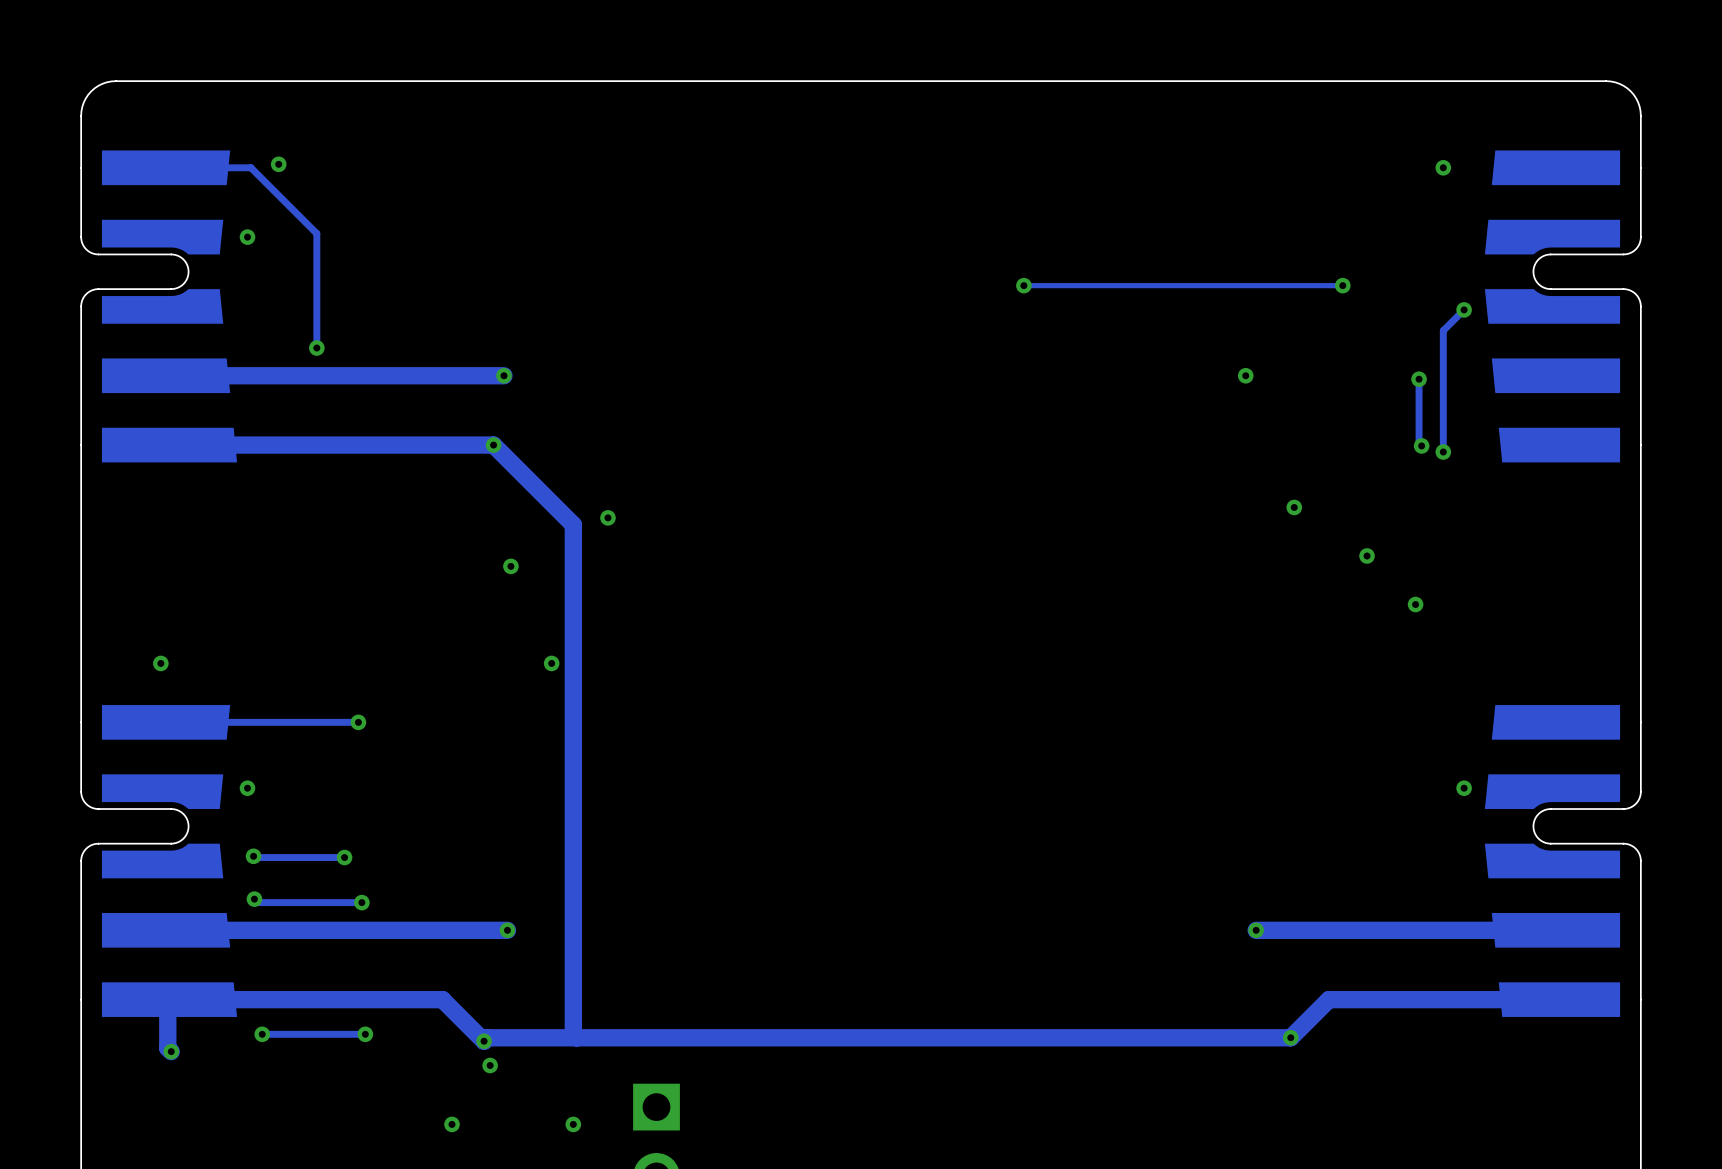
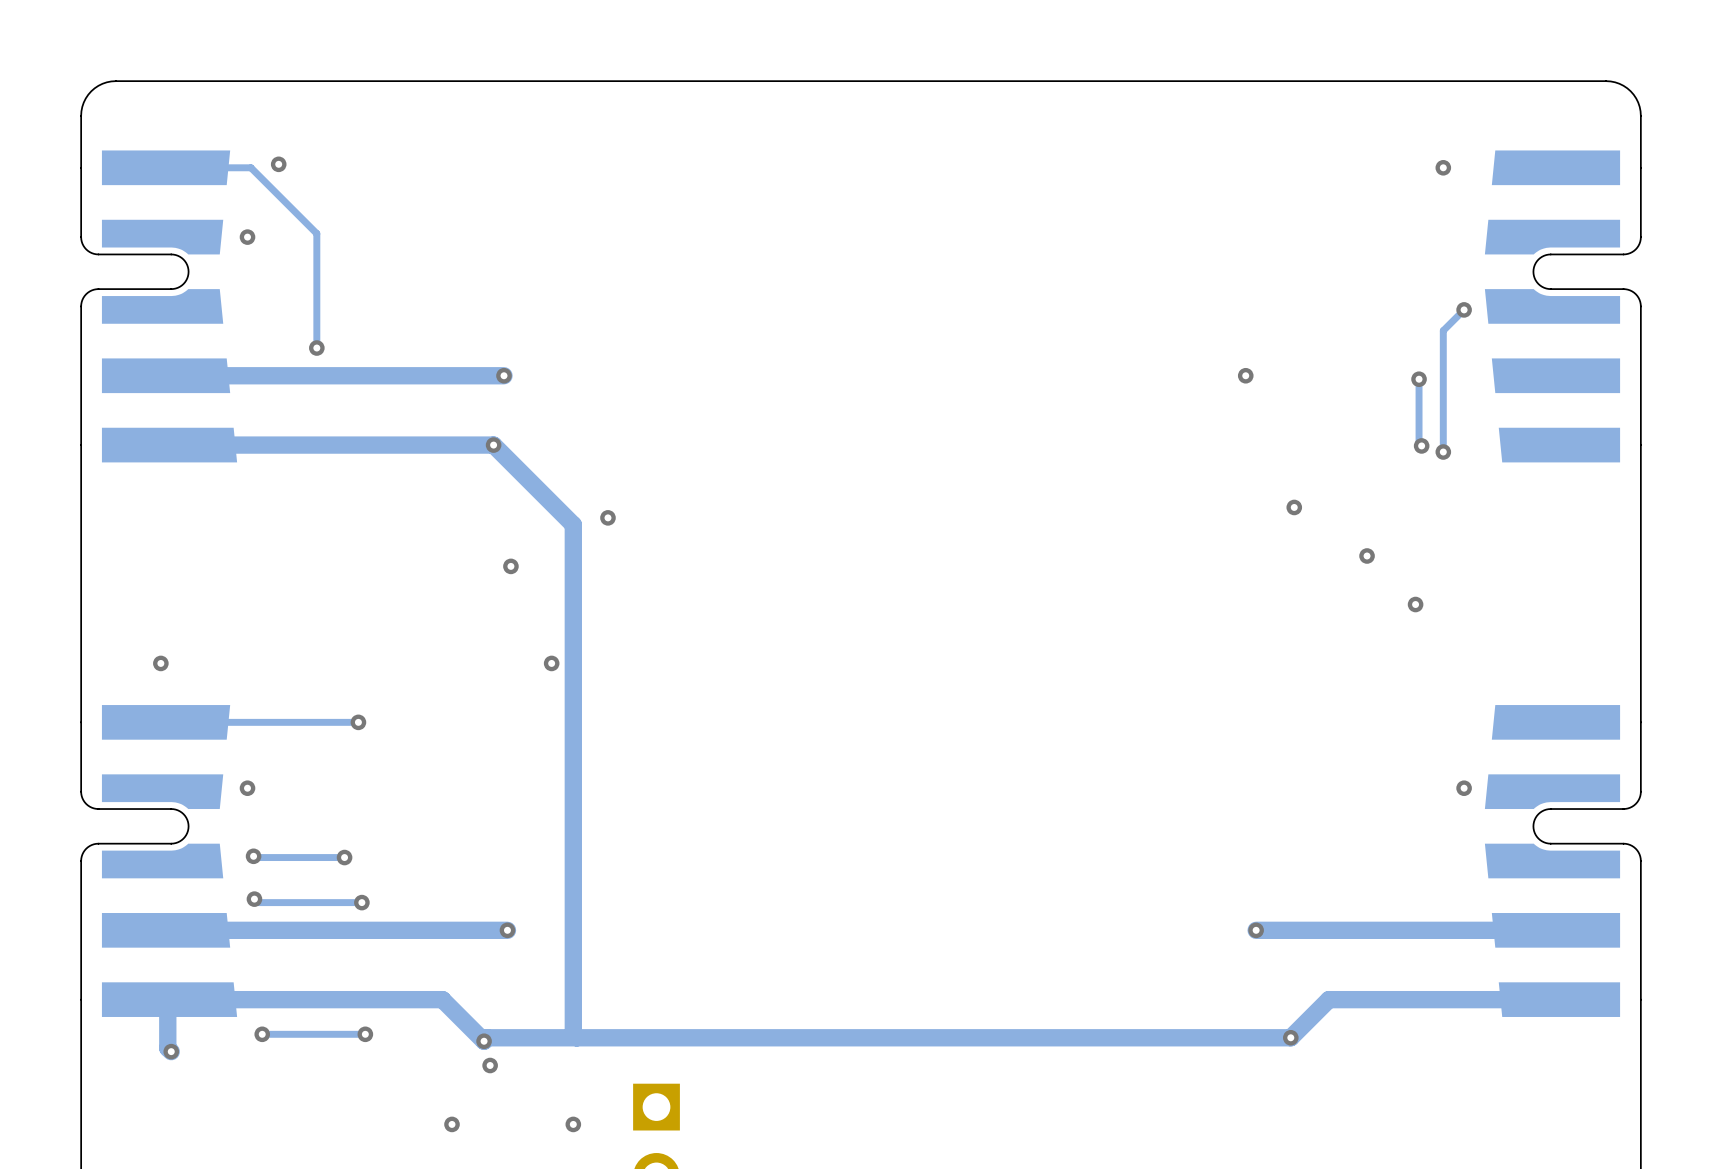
via: (1023, 285) -> none
track: (1342, 285) (1023, 285) -> none
via: (1342, 285) -> none

